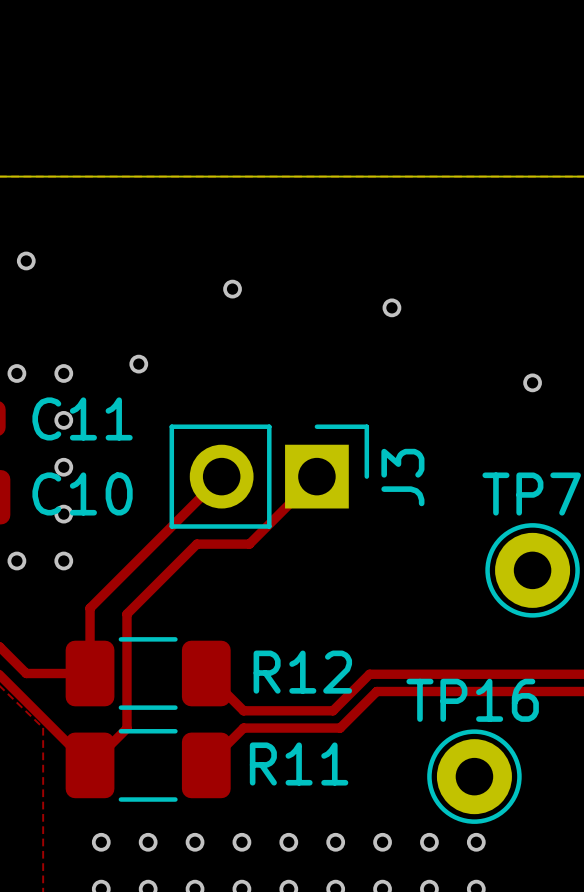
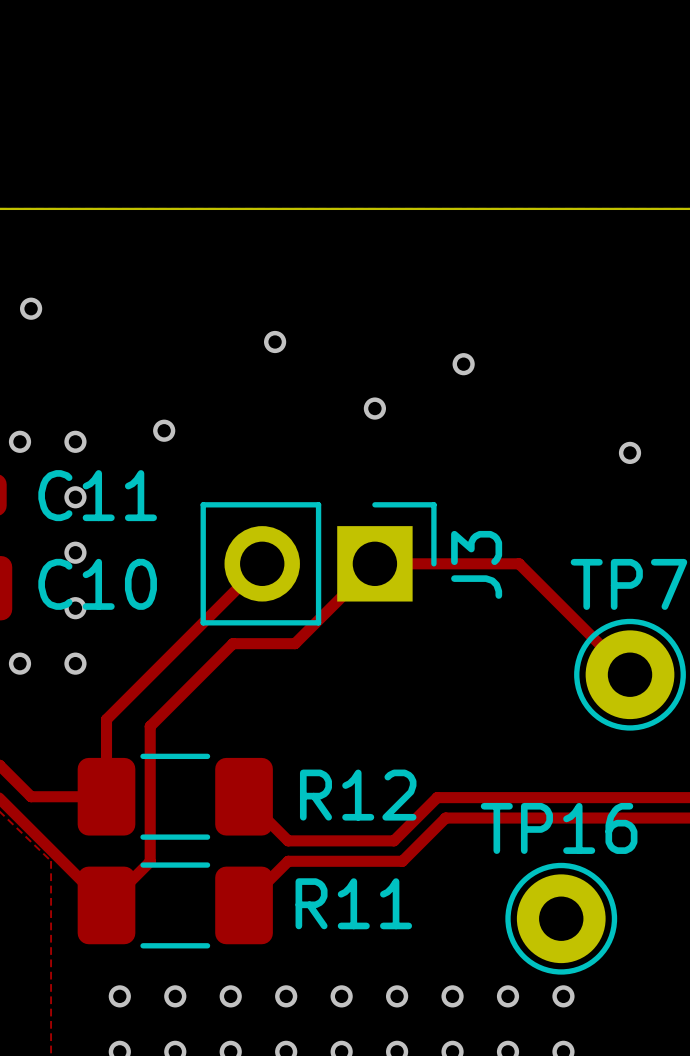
via: none -> (374, 408)
top track: none -> (374, 563) (519, 563) (630, 674)

